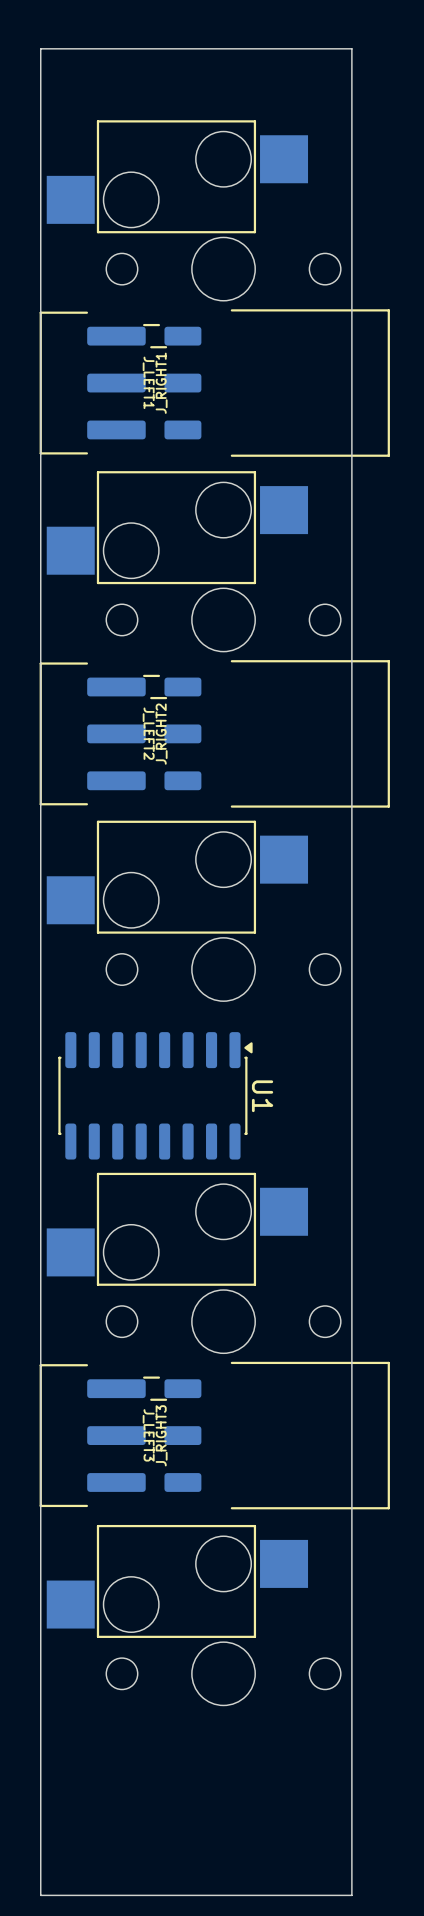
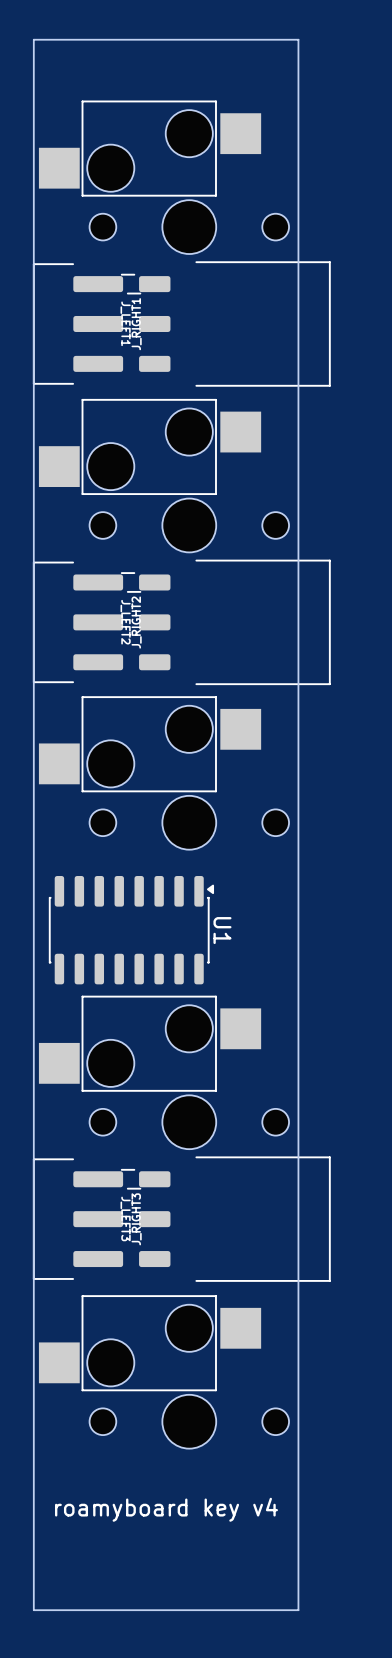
text: none -> roamyboard key v4 (166, 1509)

